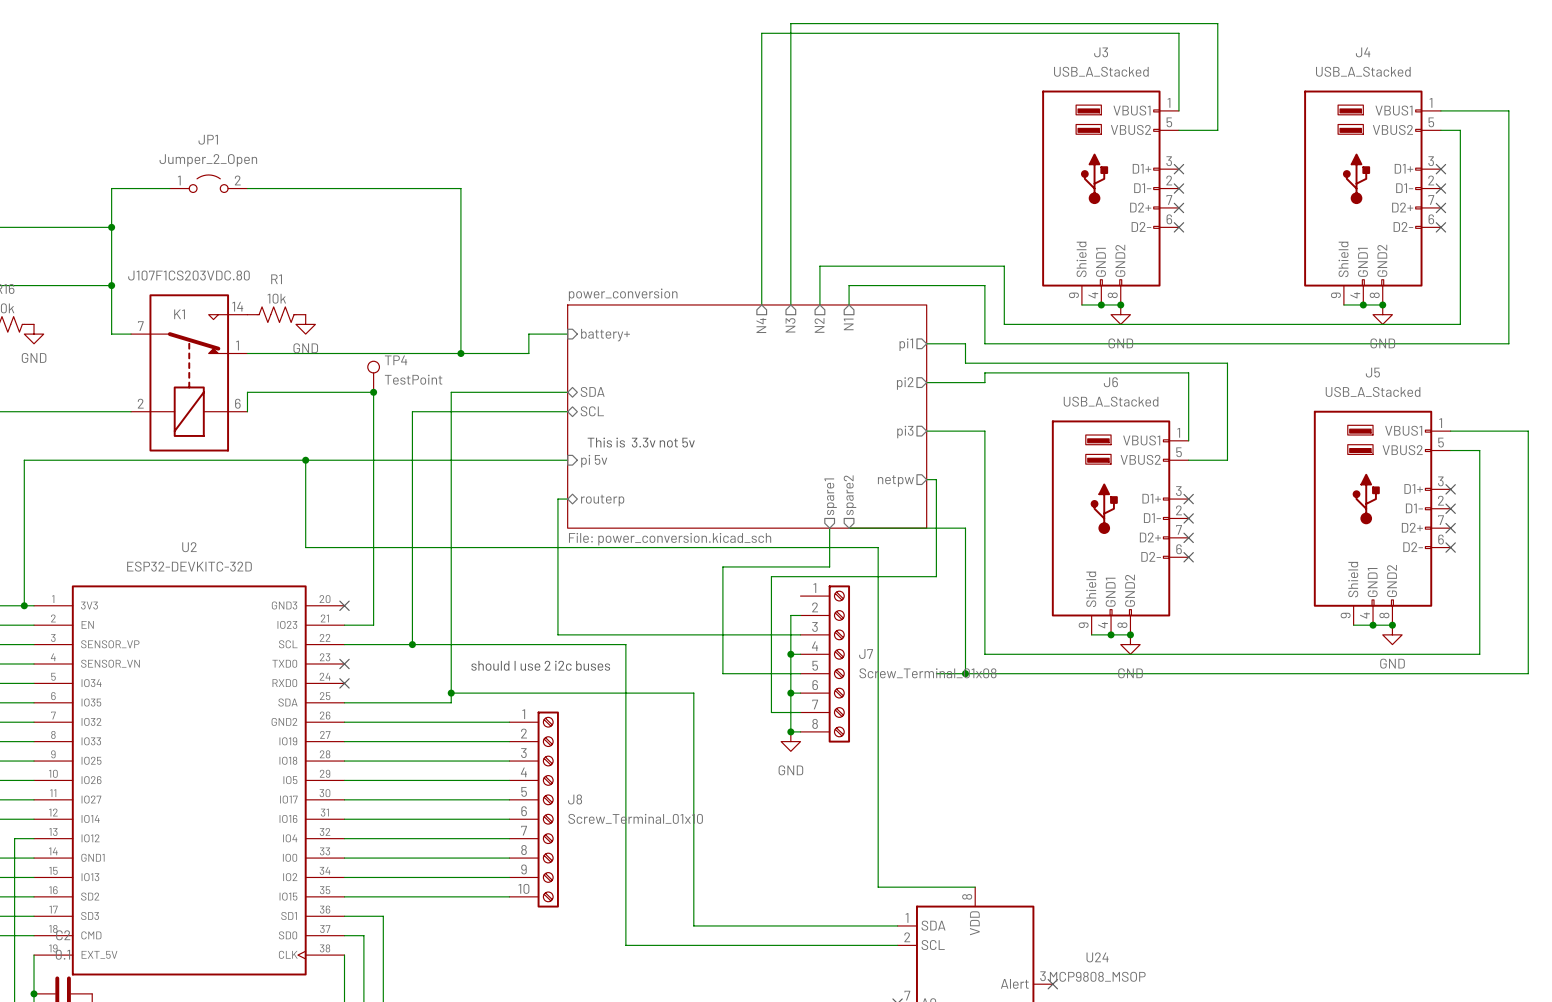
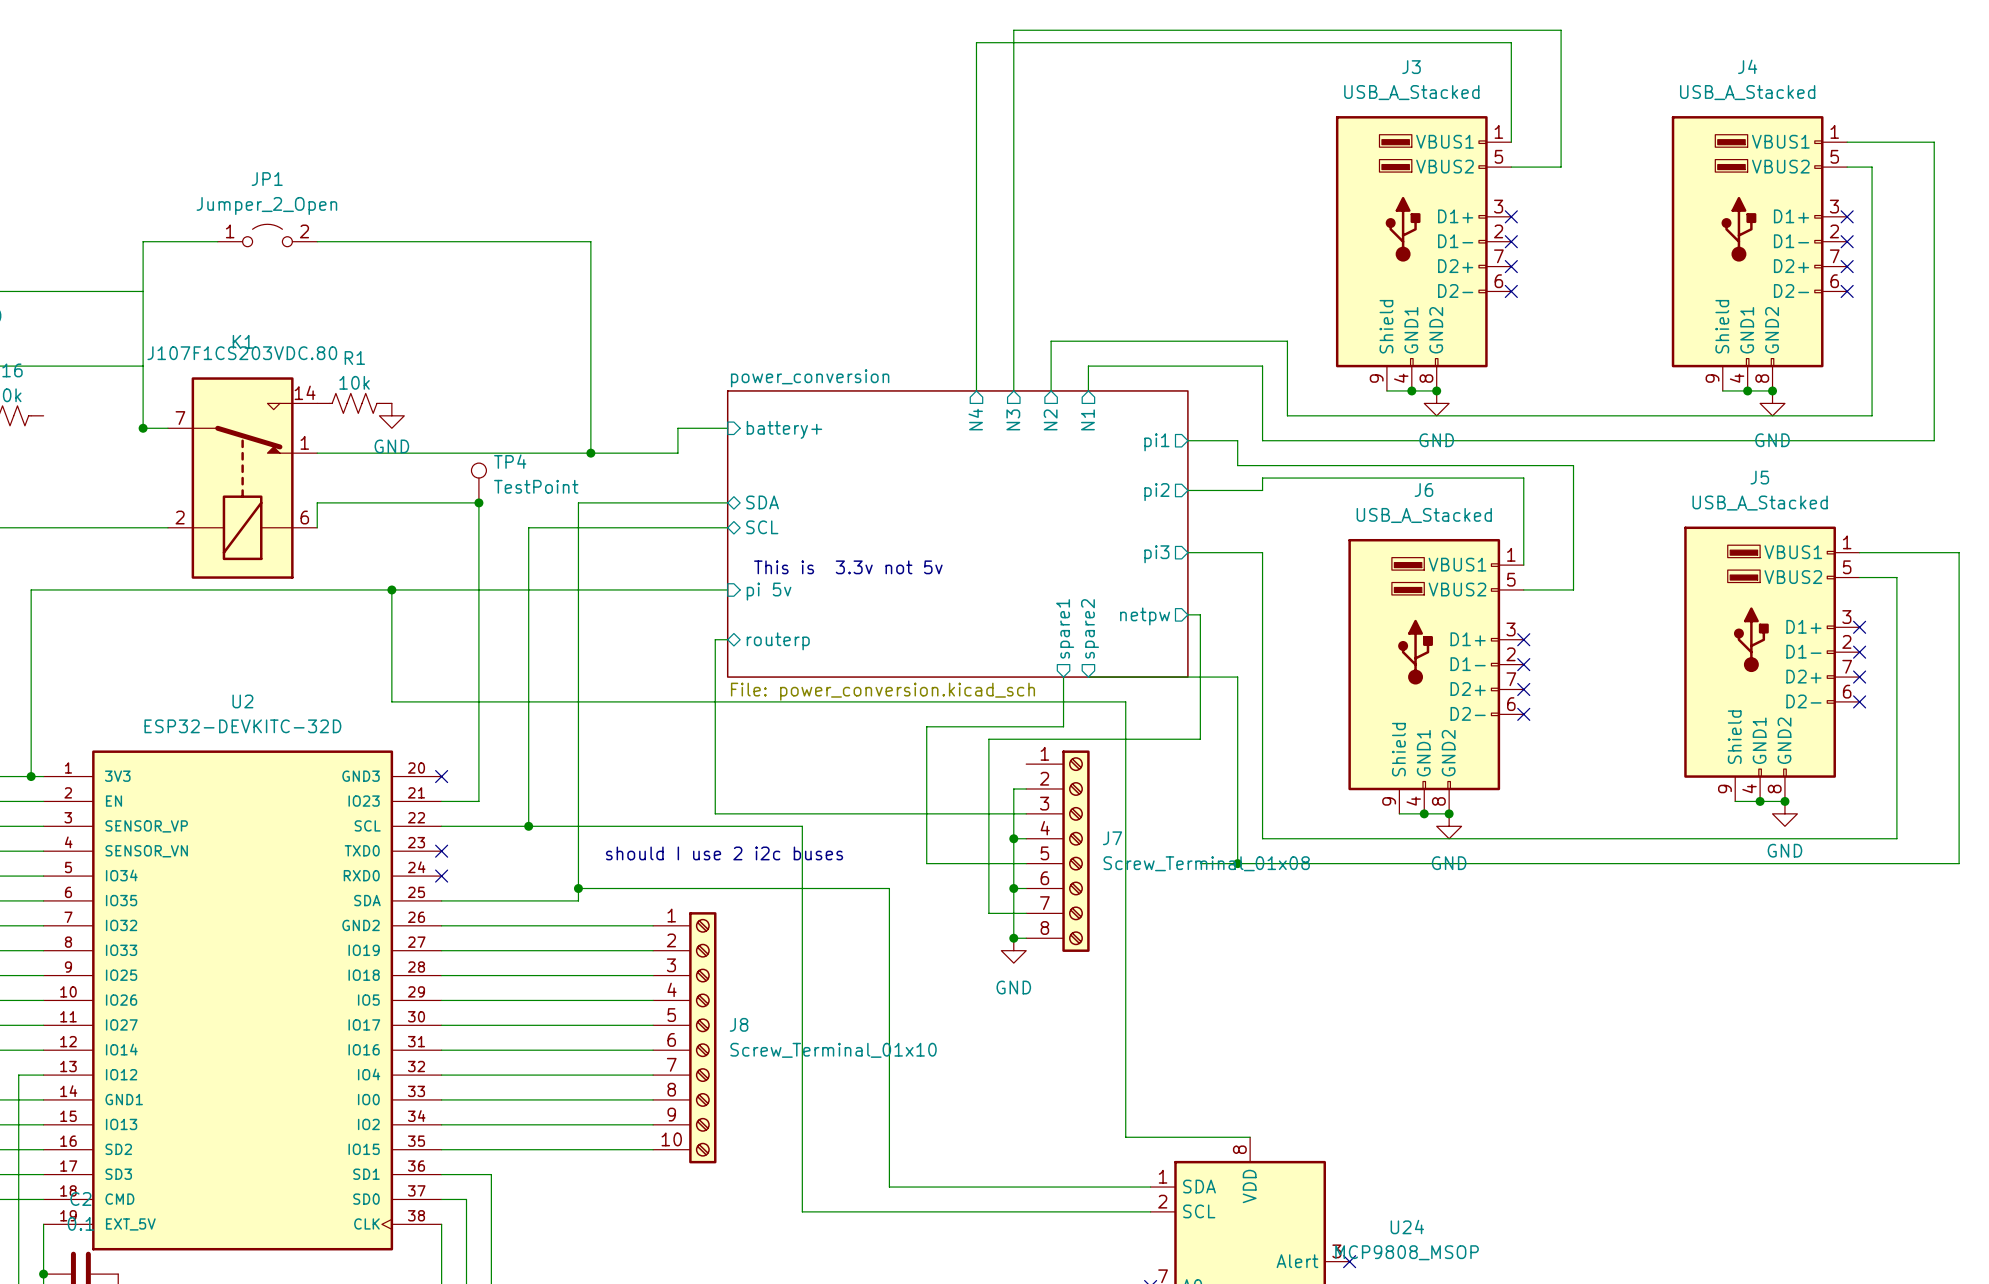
junction: (111, 227) -> none
junction: (111, 285) -> none
K1 name position: K1 (179, 314) -> K1 (242, 341)
power symbol: GND (34, 334) -> none
junction: none -> (143, 428)

